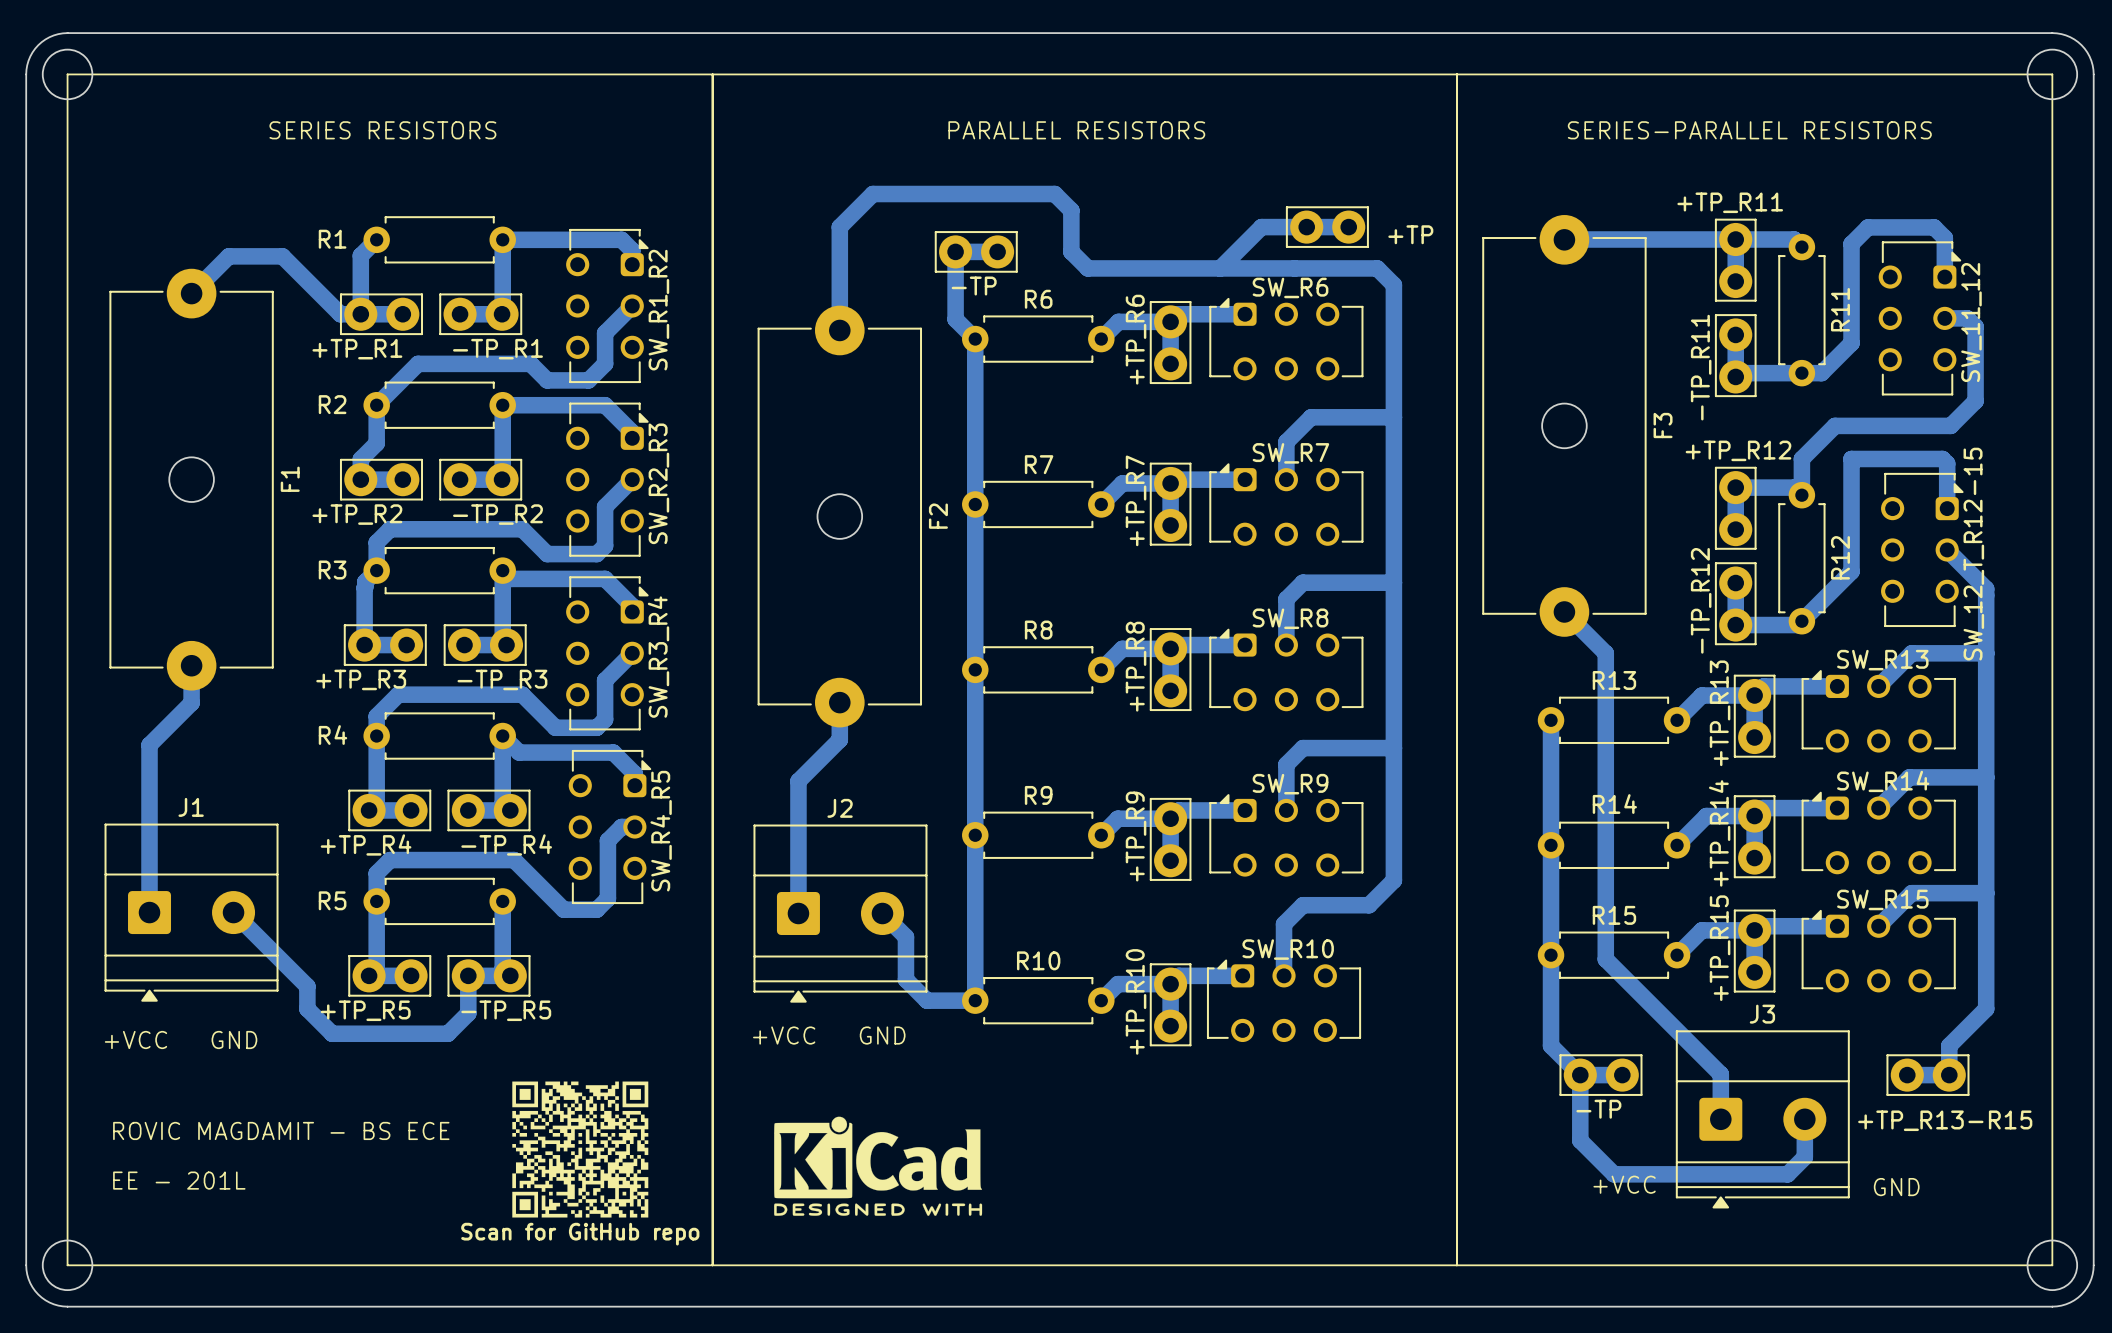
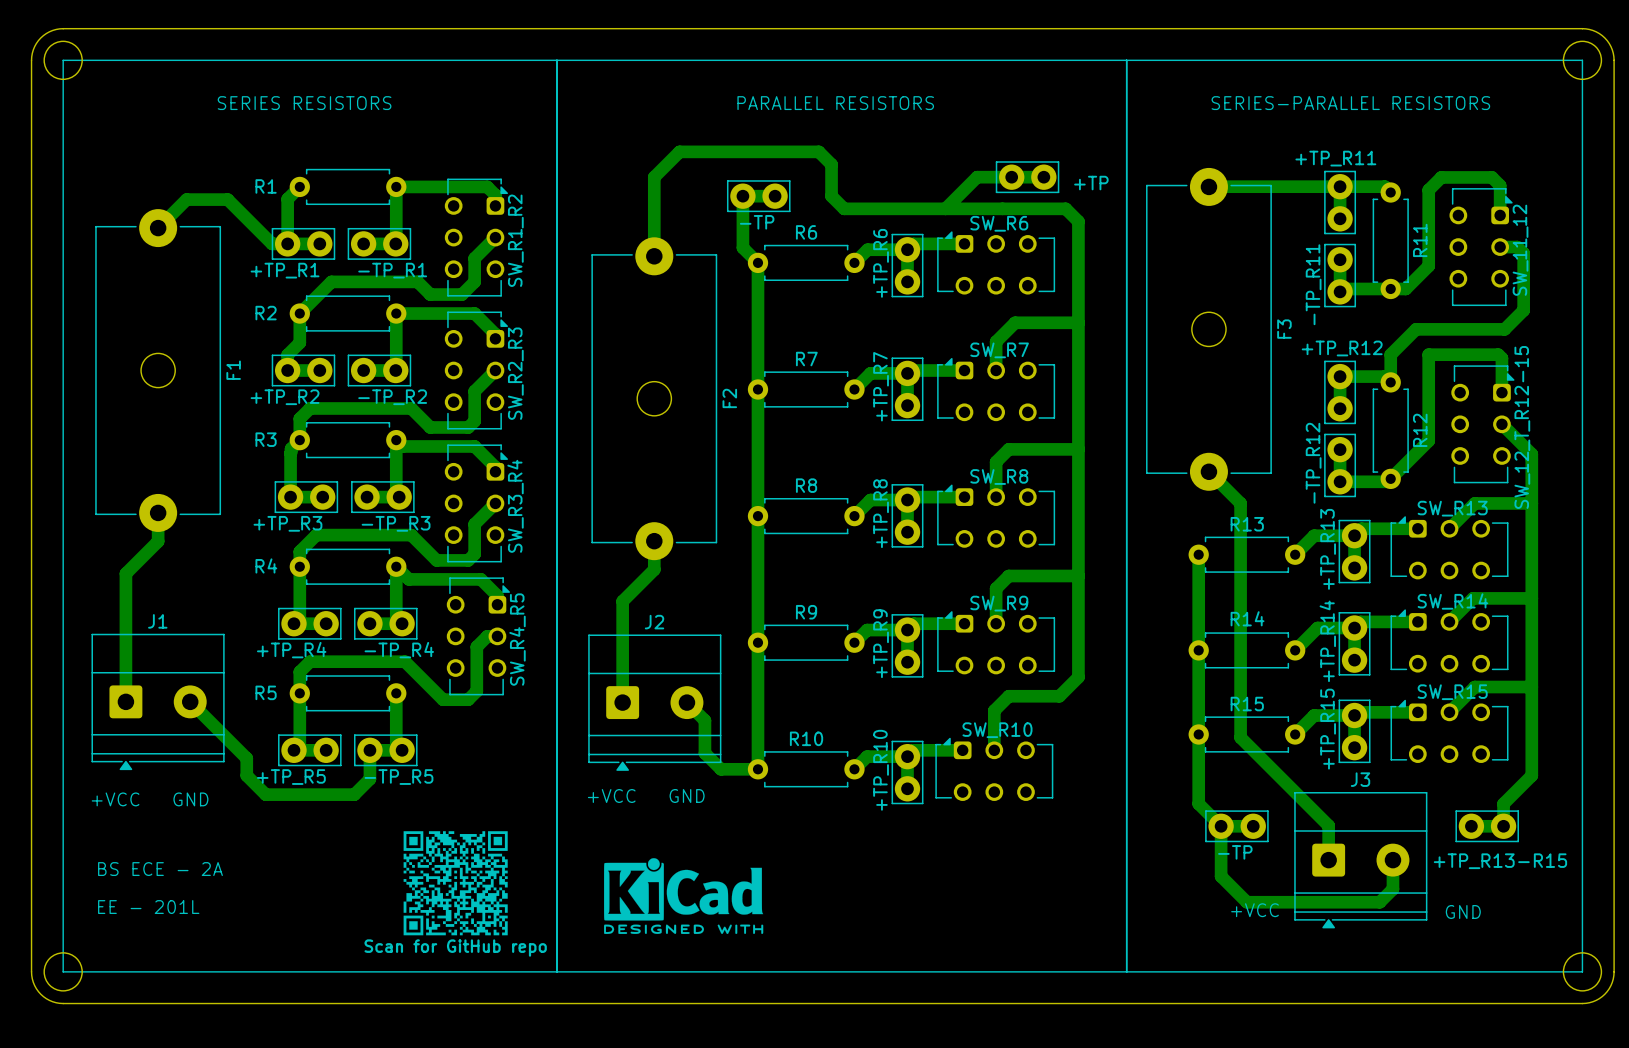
text: ROVIC MAGDAMIT - BS ECE (281, 1130) -> BS ECE - 2A (160, 869)

